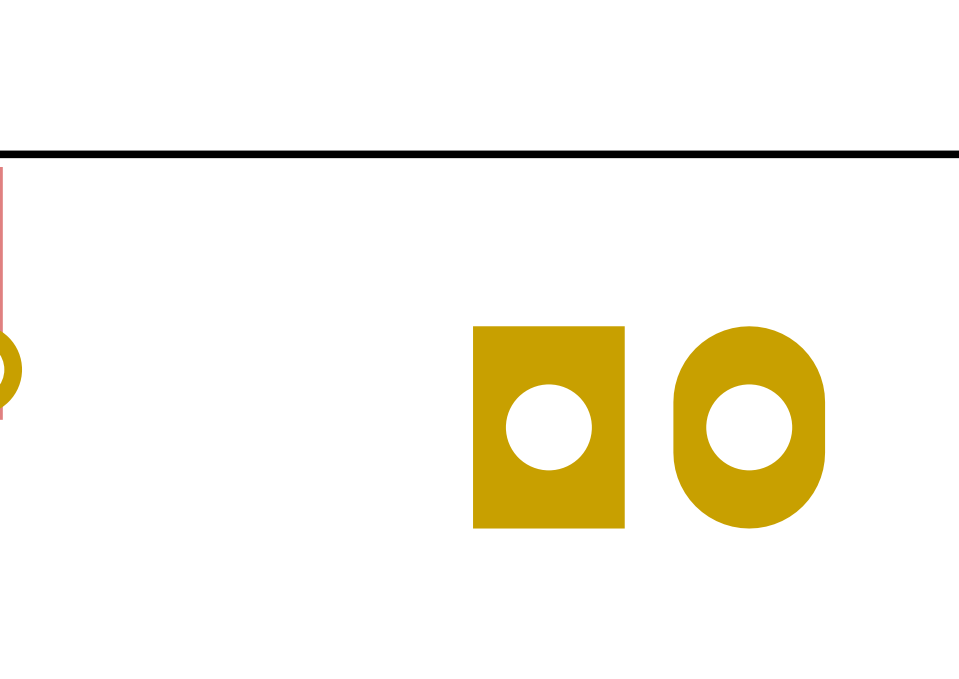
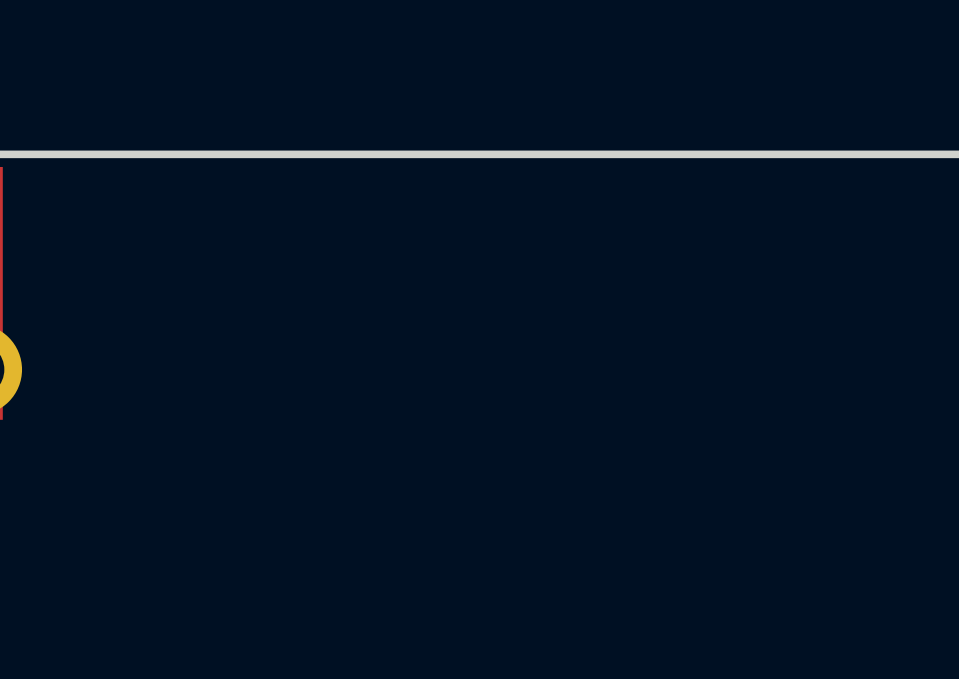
part: (649, 427) -> none

